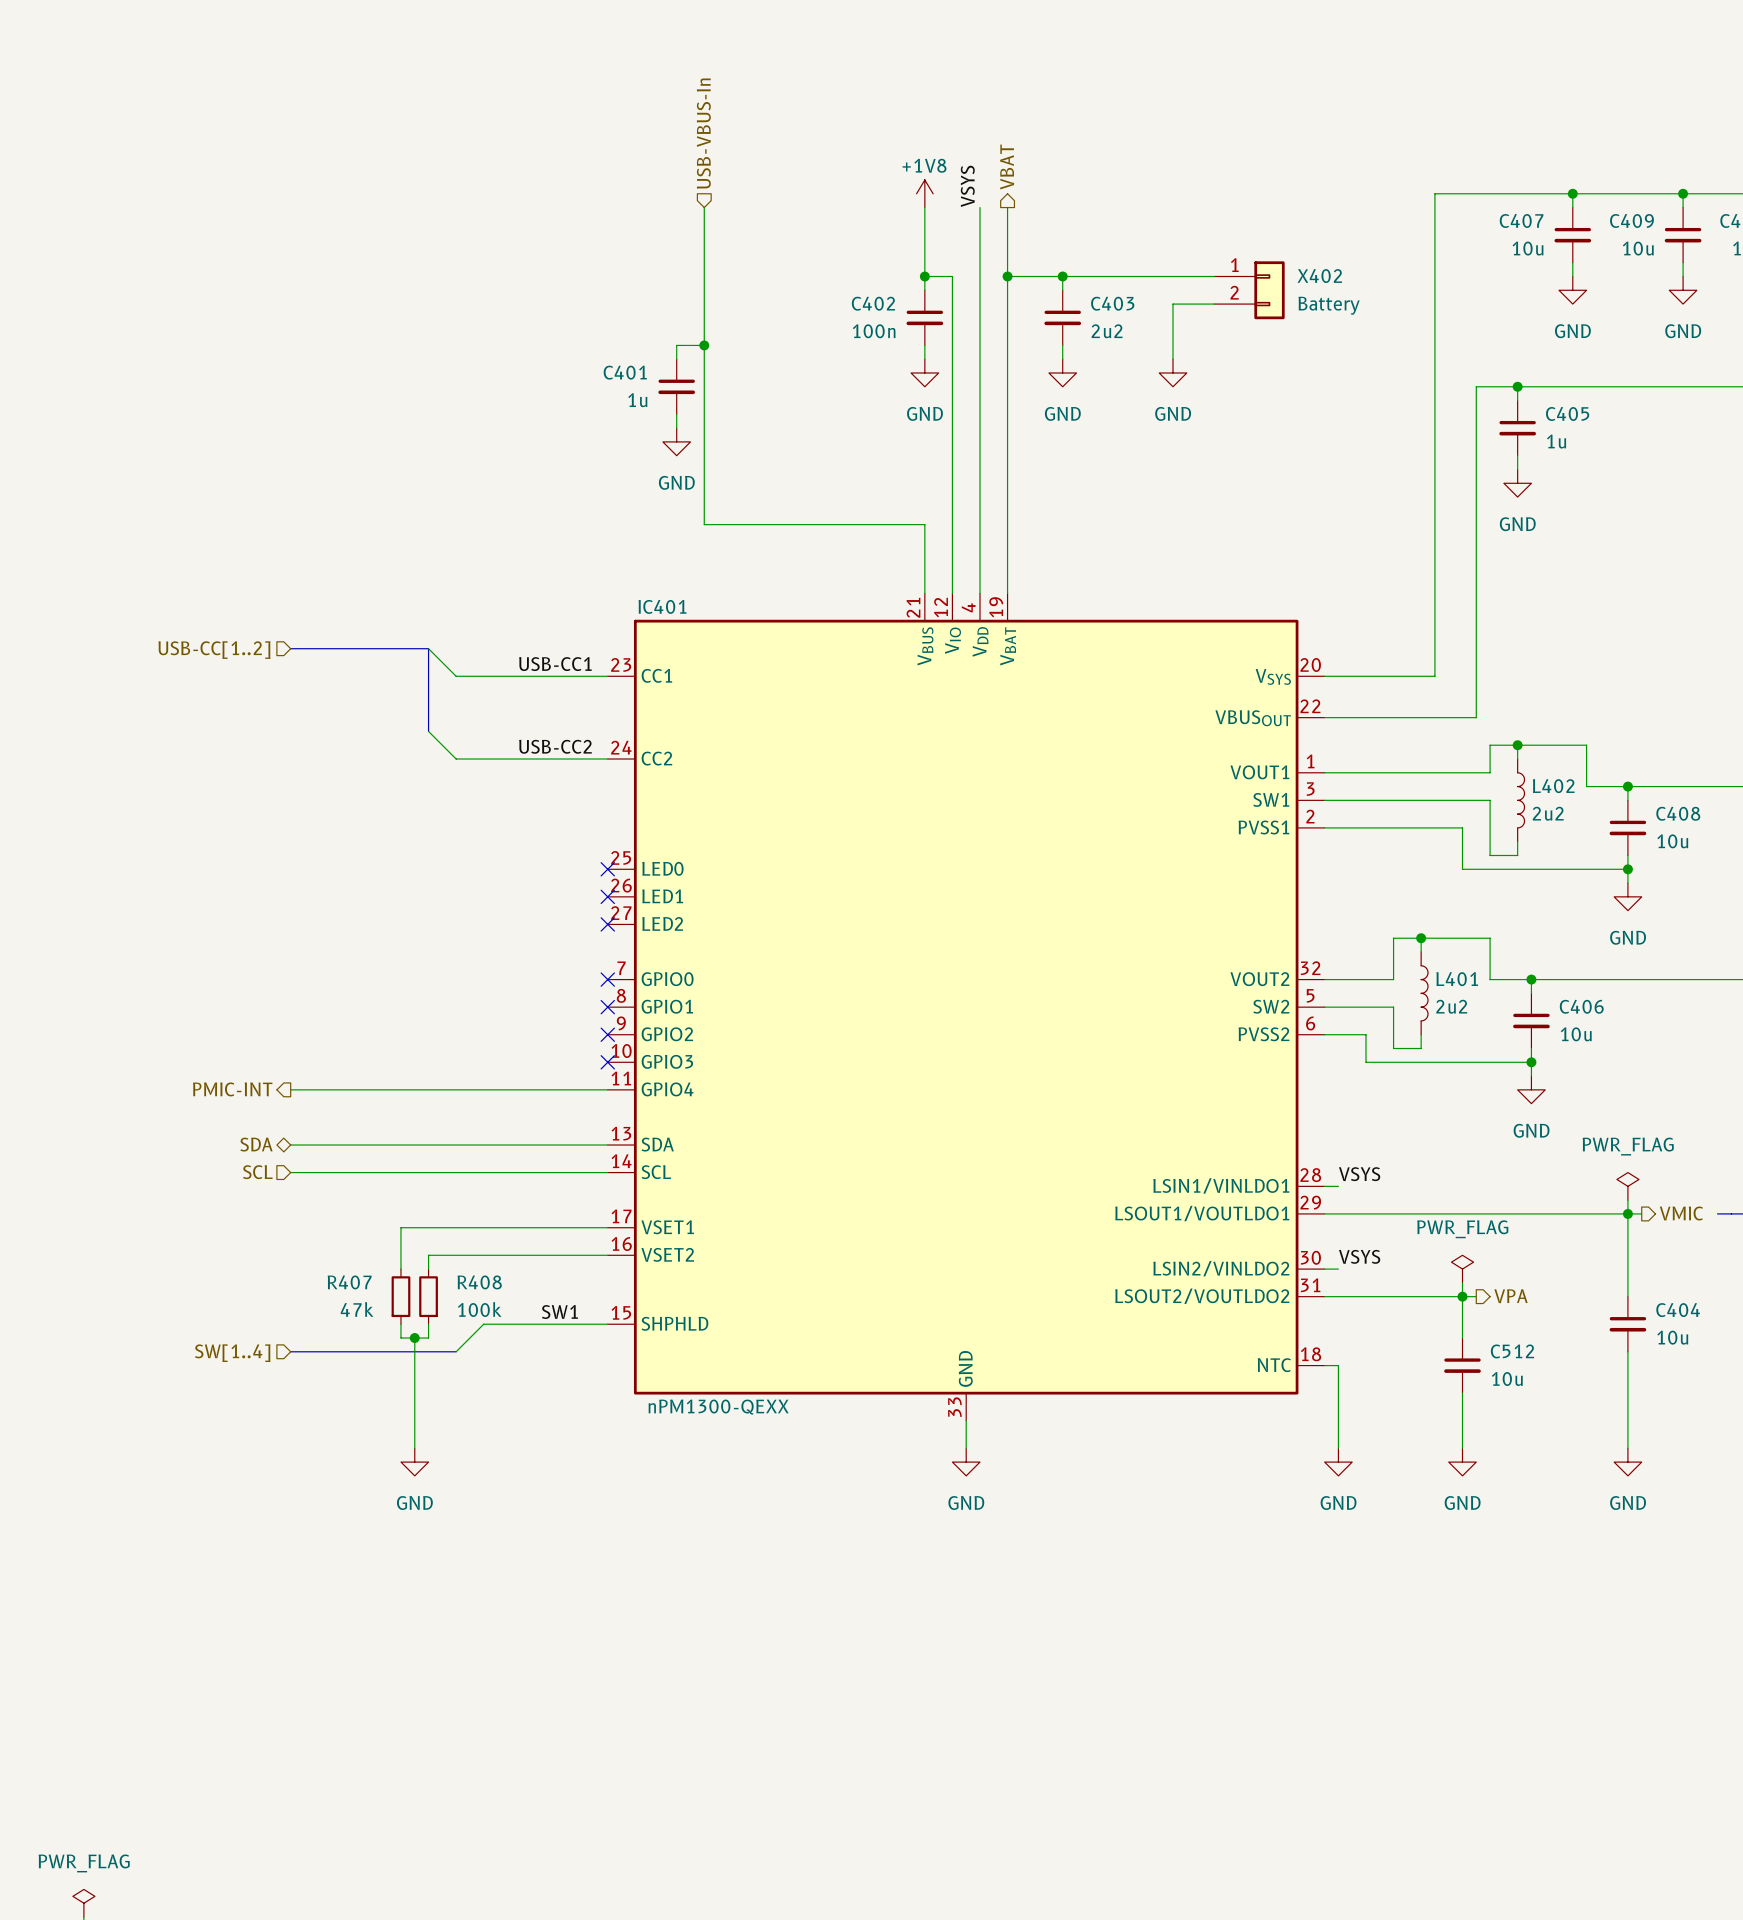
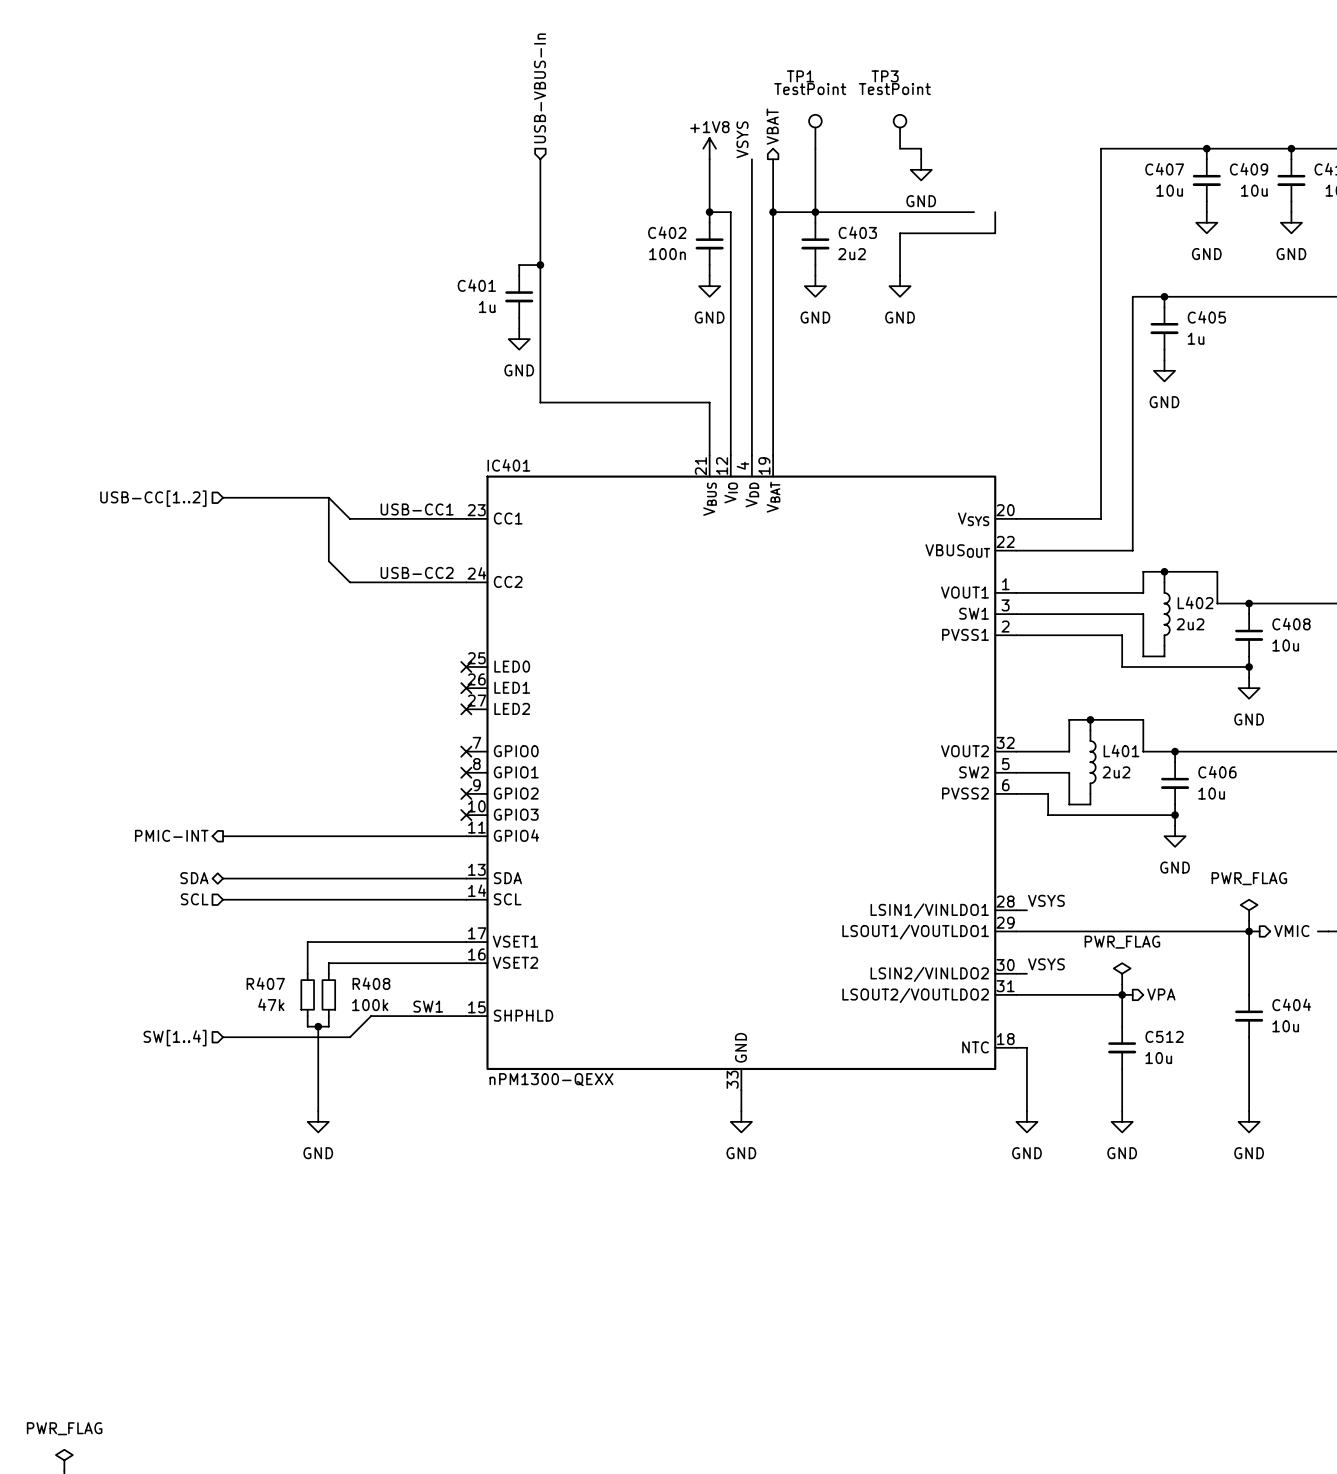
TP1: none -> TestPoint (815, 131)
TP3: none -> TestPoint (900, 131)
wire: none -> (815, 148) (815, 212)
wire: none -> (900, 148) (921, 148) (921, 159)
power symbol: none -> GND (921, 169)
wire: none -> (995, 212) (995, 233) (931, 233)
X402: Battery (1249, 290) -> none

